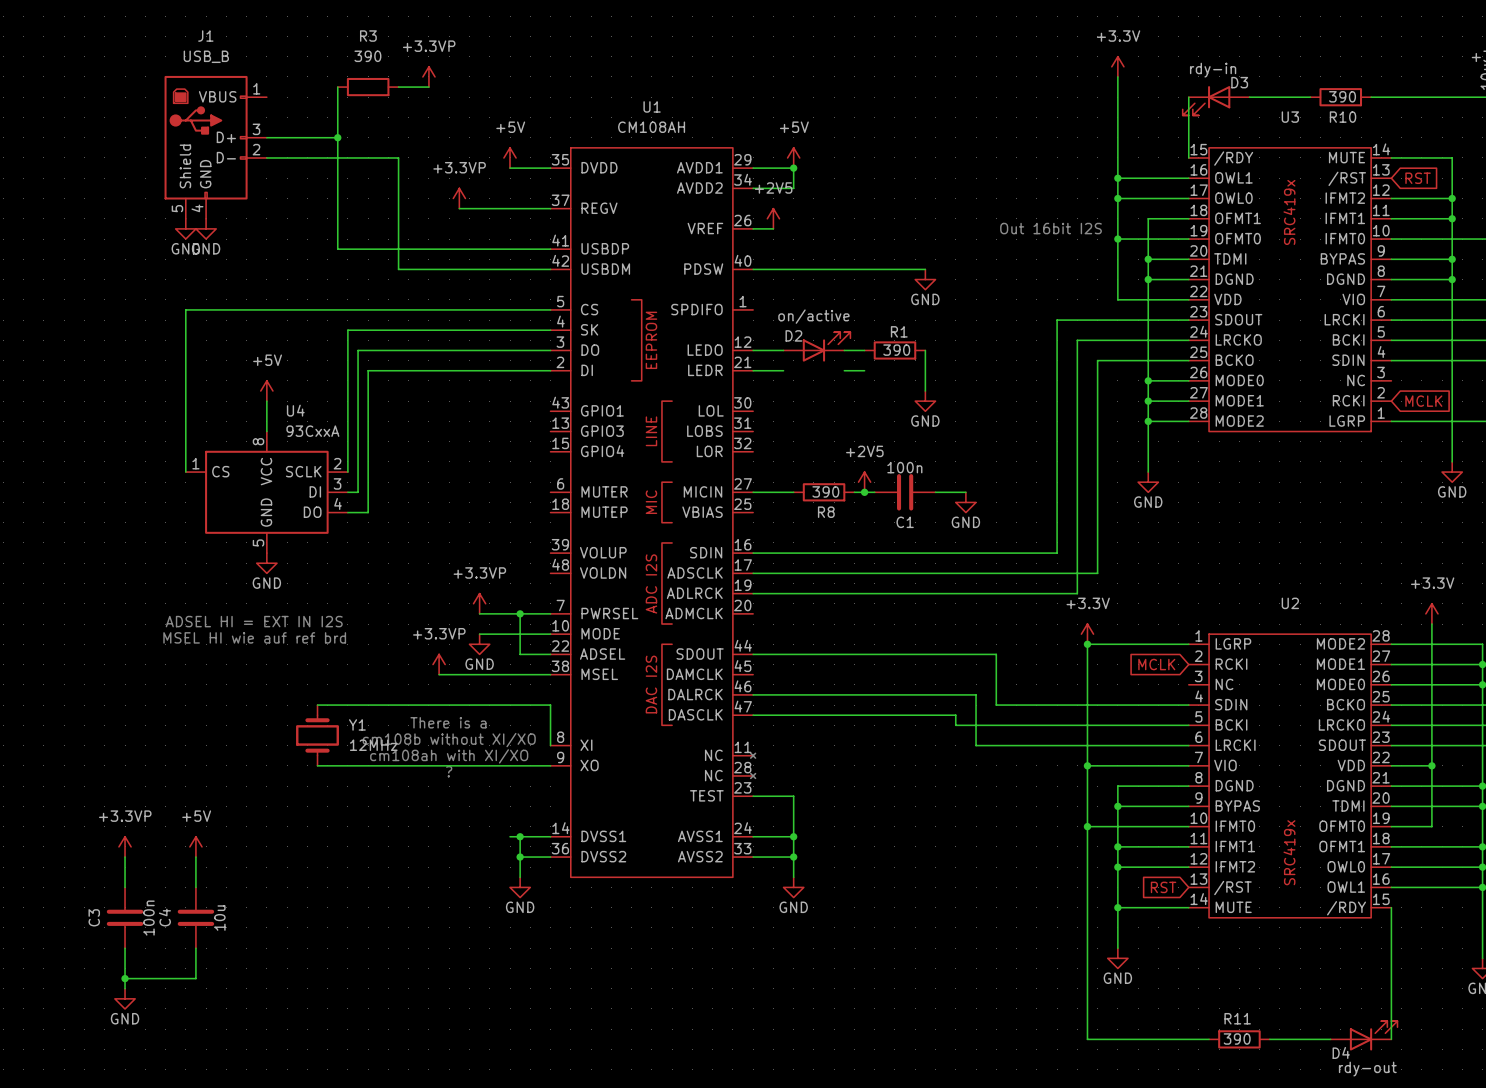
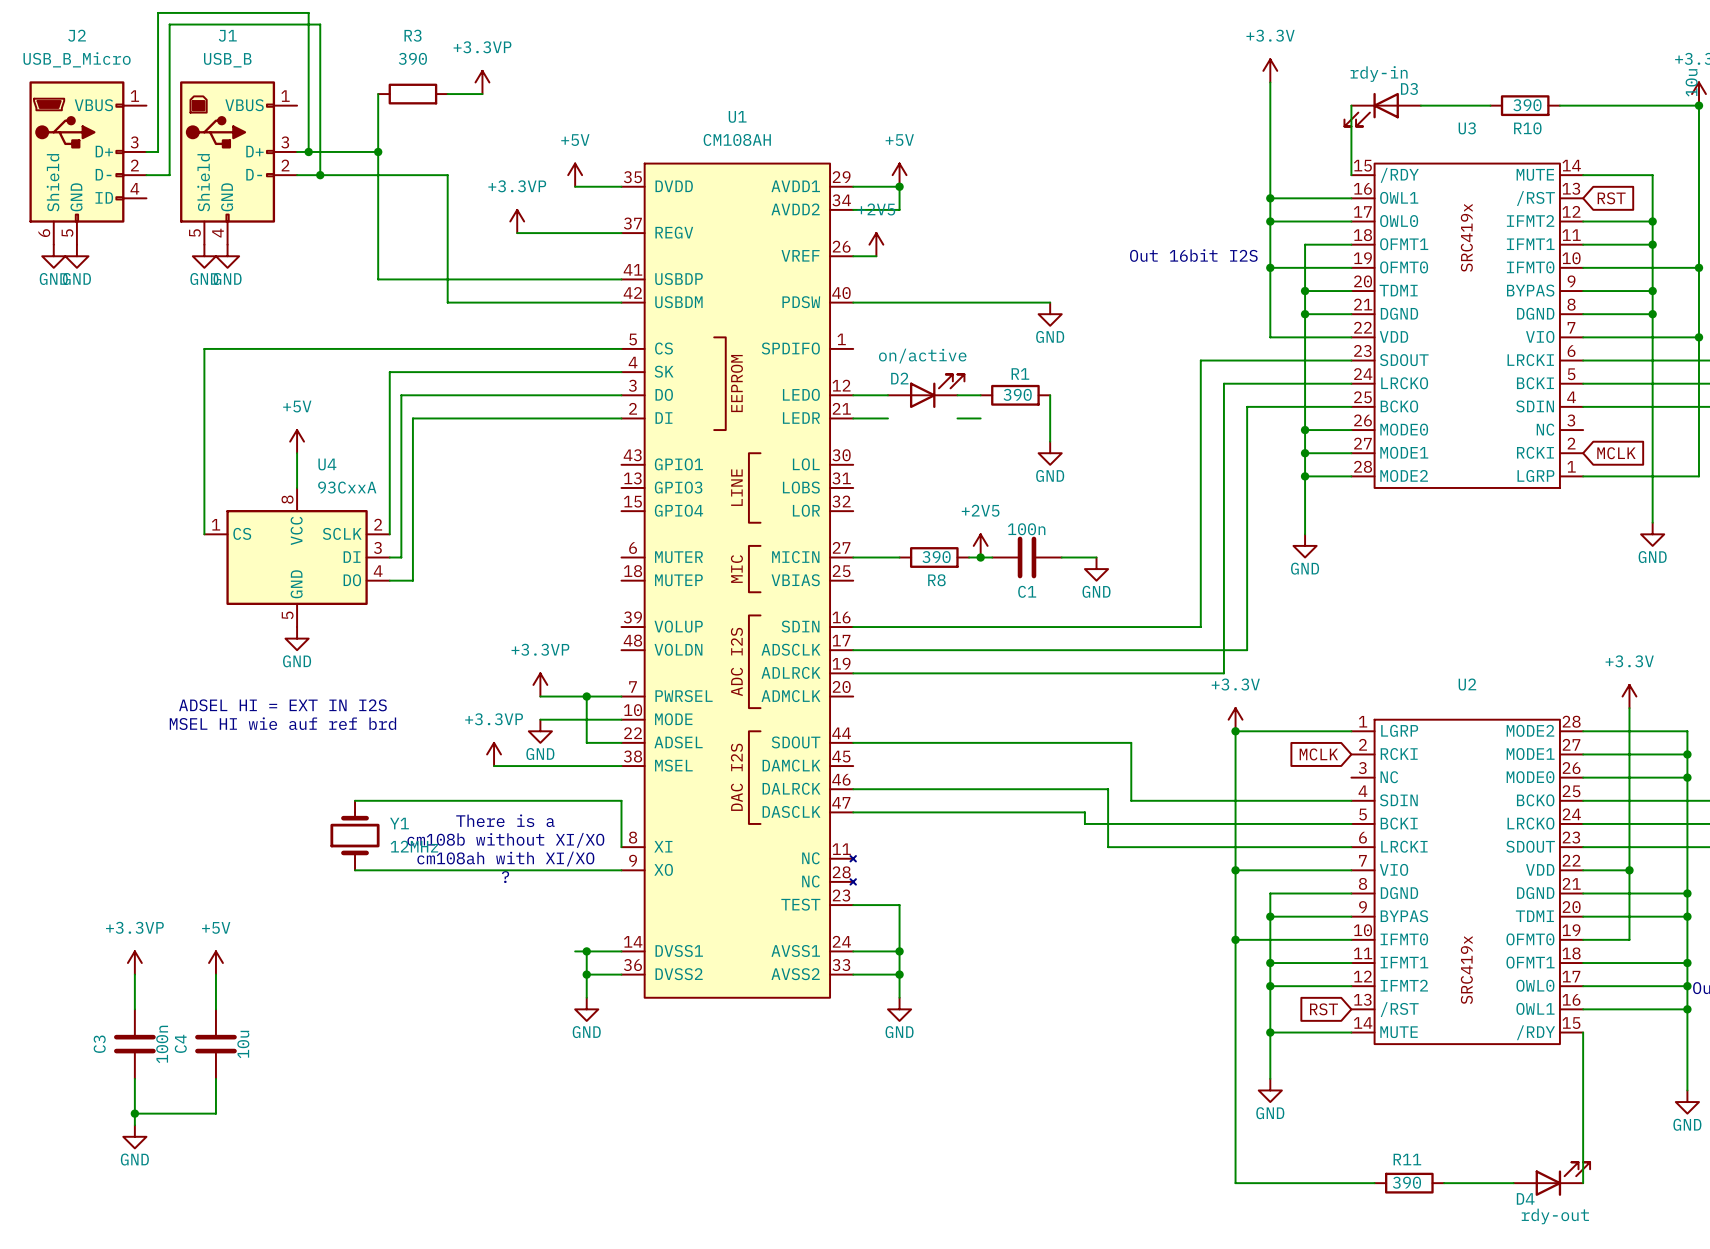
wire: none -> (146, 151) (158, 151) (158, 12) (308, 12) (308, 151)
junction: none -> (308, 151)
J2: none -> USB_B_Micro (87, 162)
wire: none -> (146, 175) (169, 175) (169, 24) (320, 24) (320, 175)
junction: none -> (320, 175)
power symbol: none -> GND (53, 256)
power symbol: none -> GND (76, 256)

